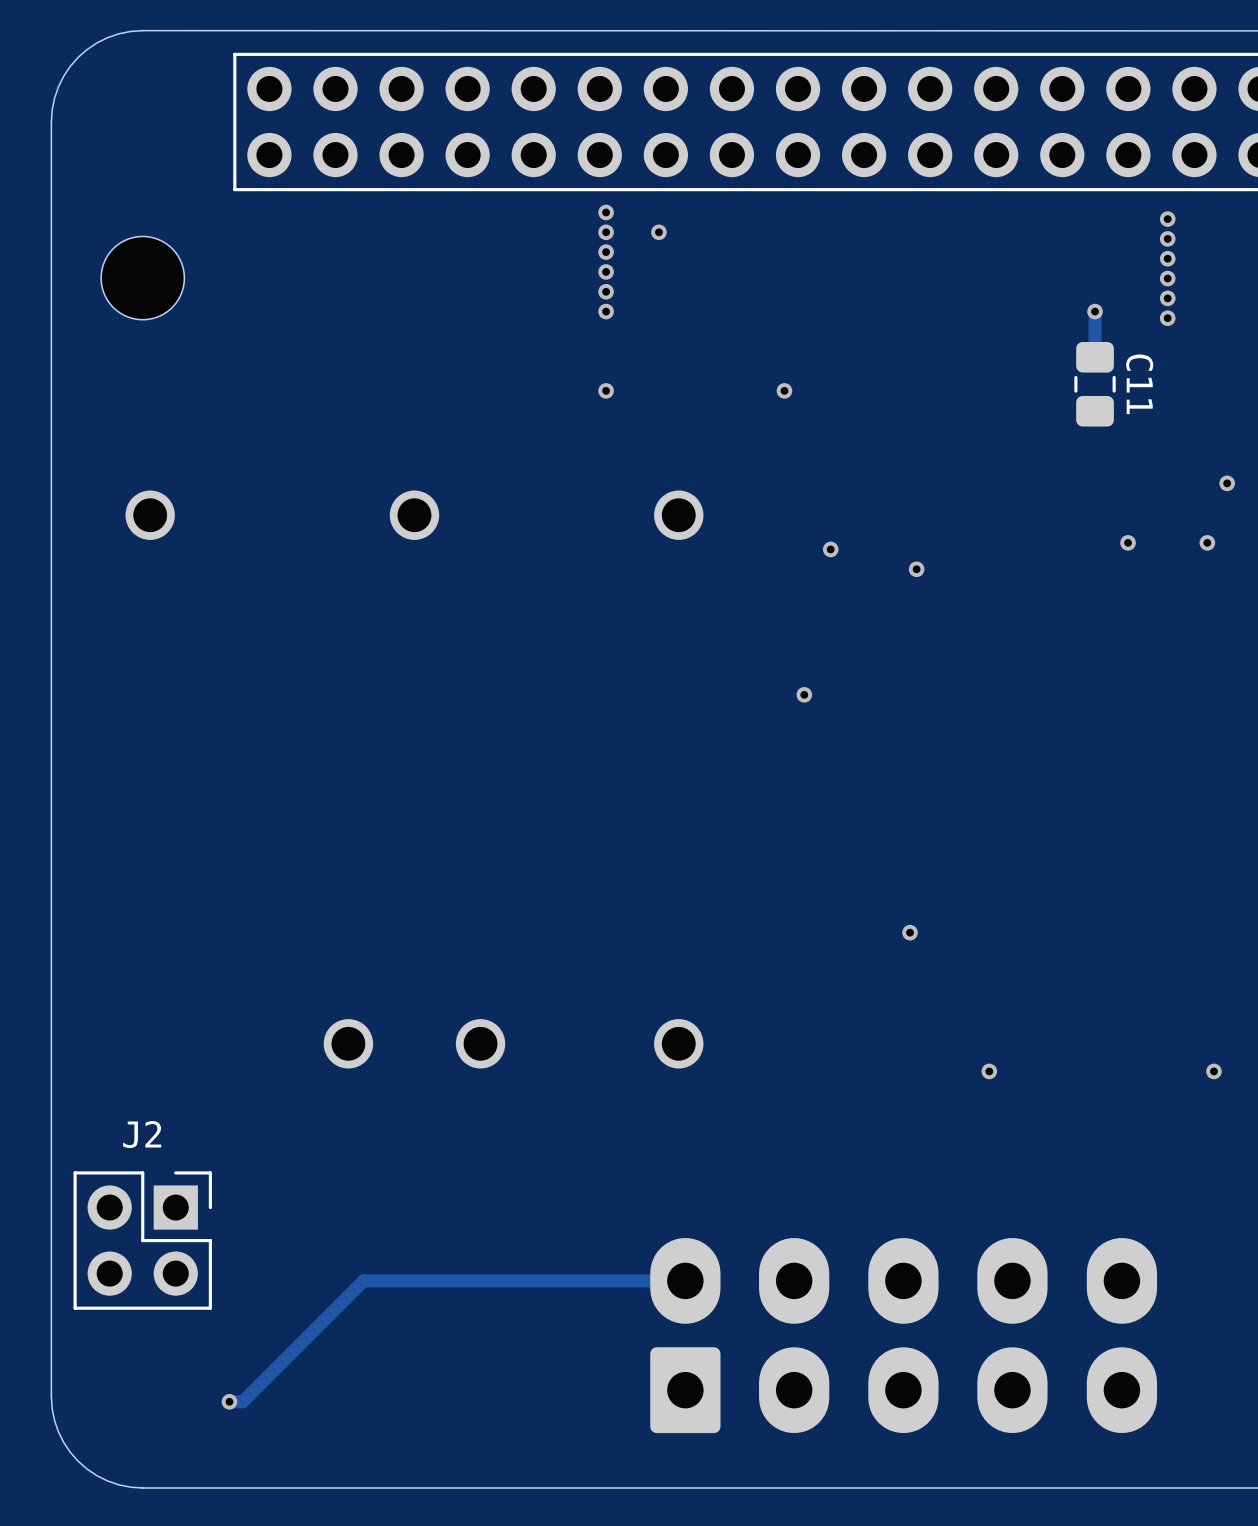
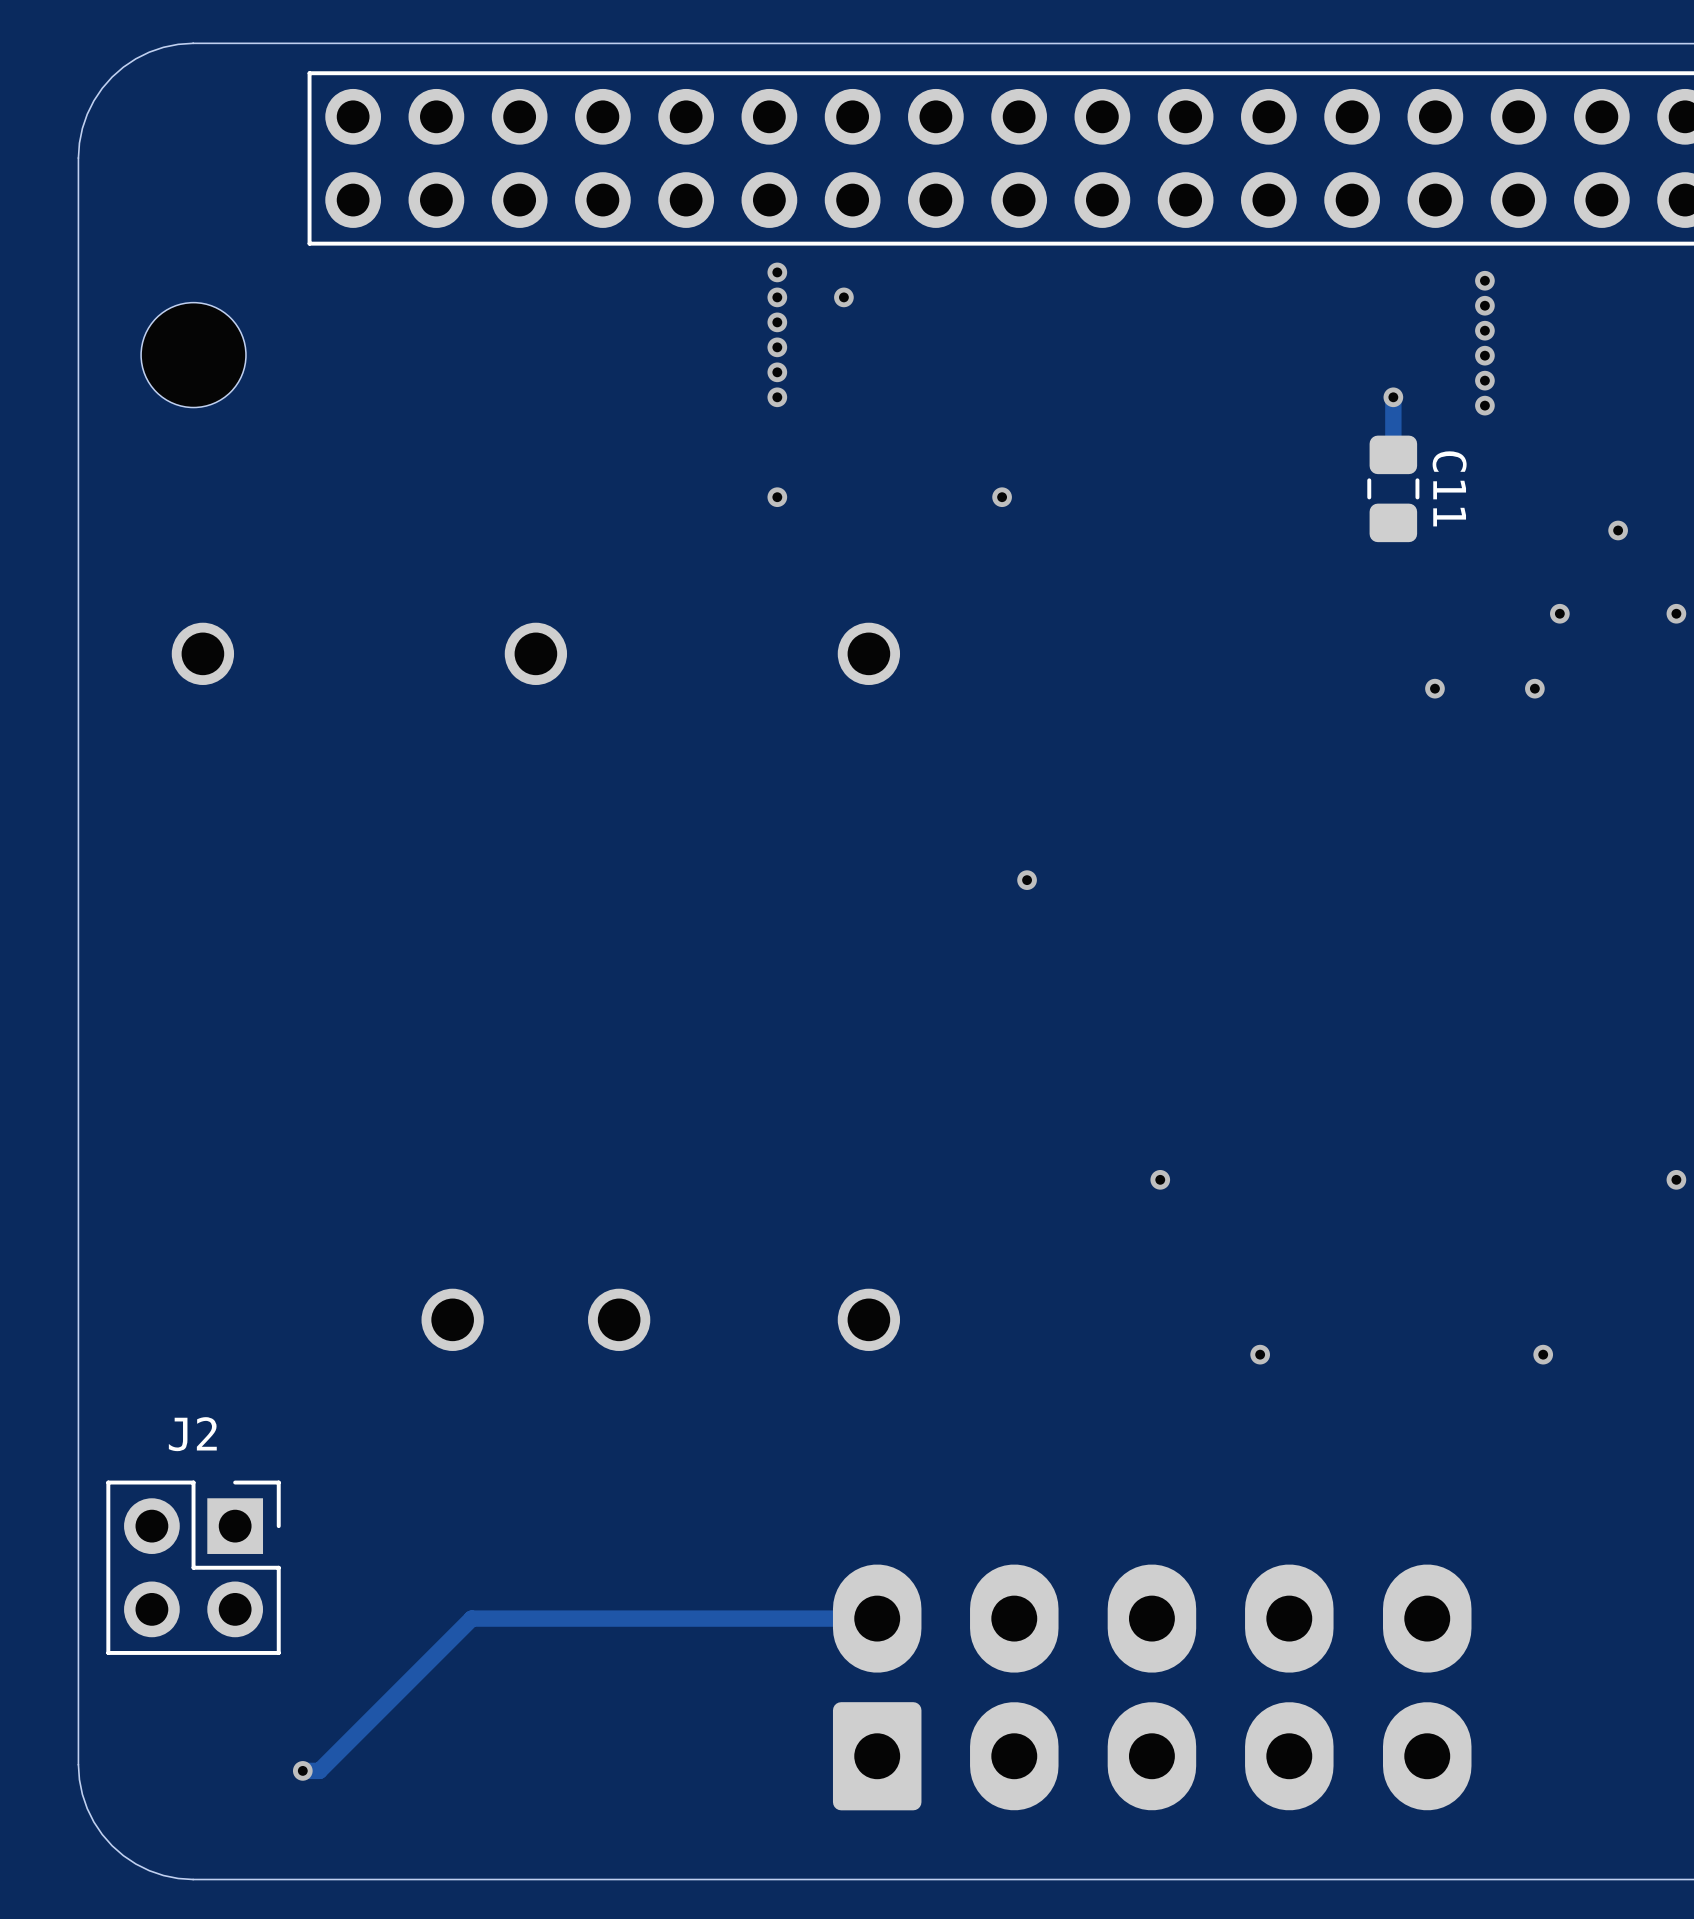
via: (830, 549) -> none
via: (916, 569) -> none

